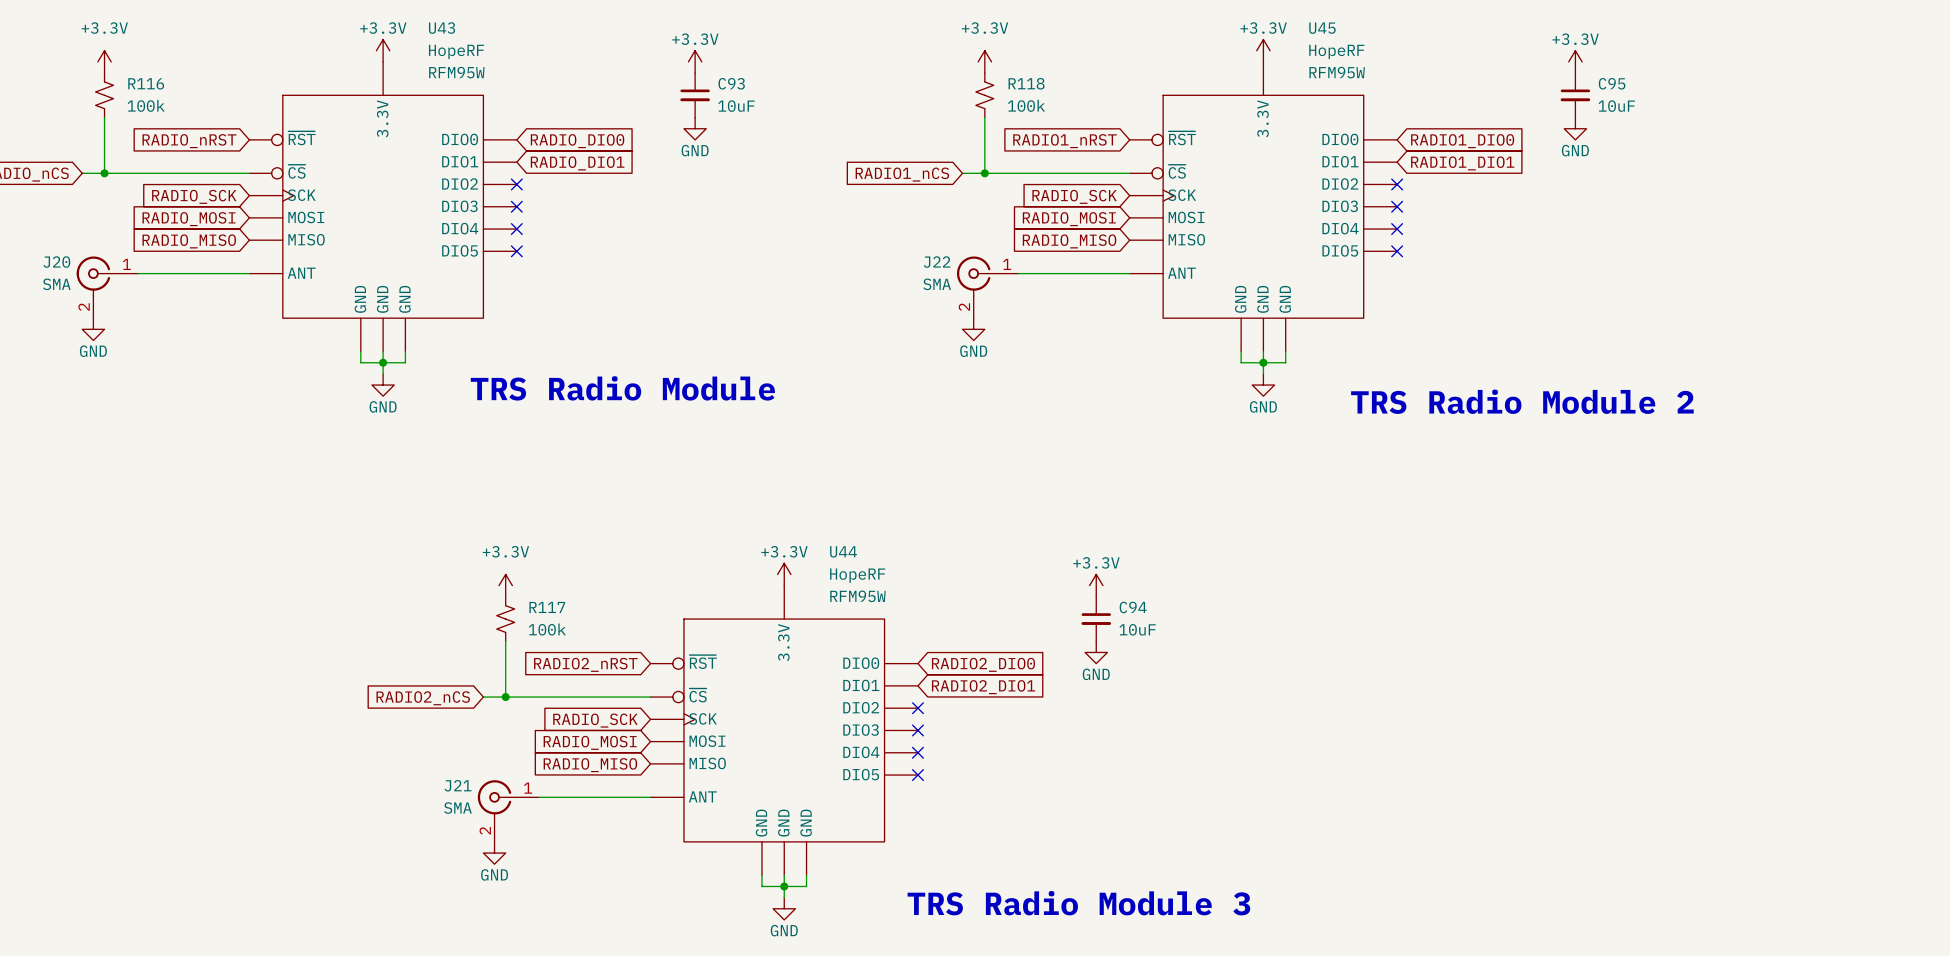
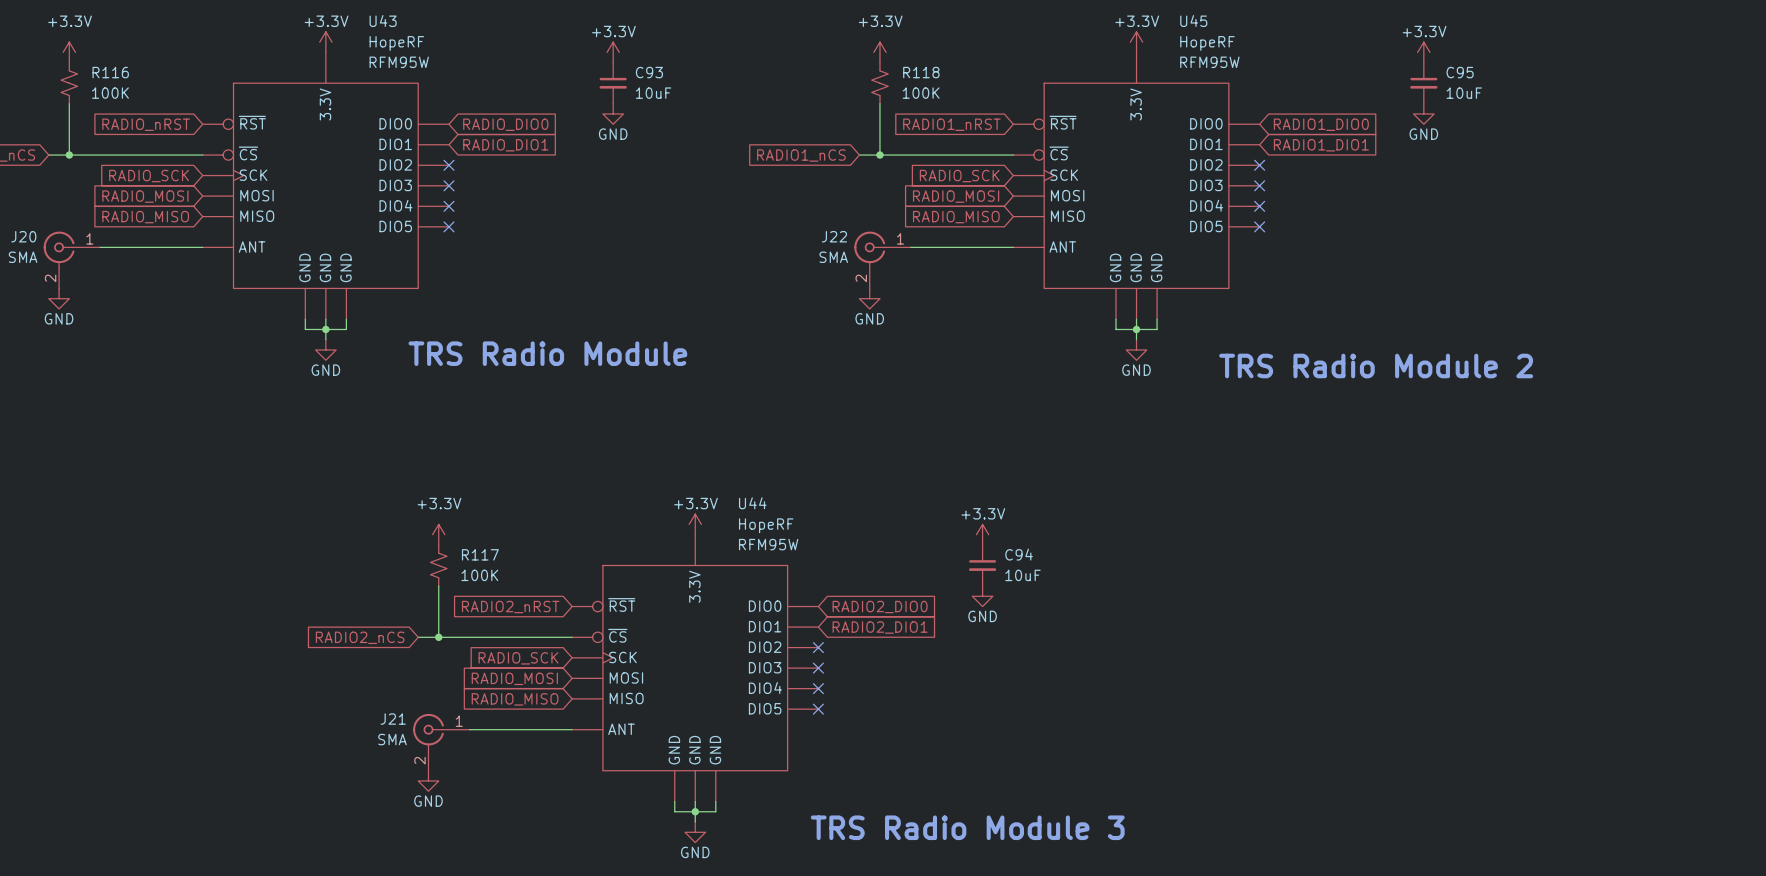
R116 value: 100k (146, 105) -> 100K (110, 93)
R118 value: 100k (1026, 105) -> 100K (921, 93)
R117 value: 100k (547, 629) -> 100K (479, 575)

